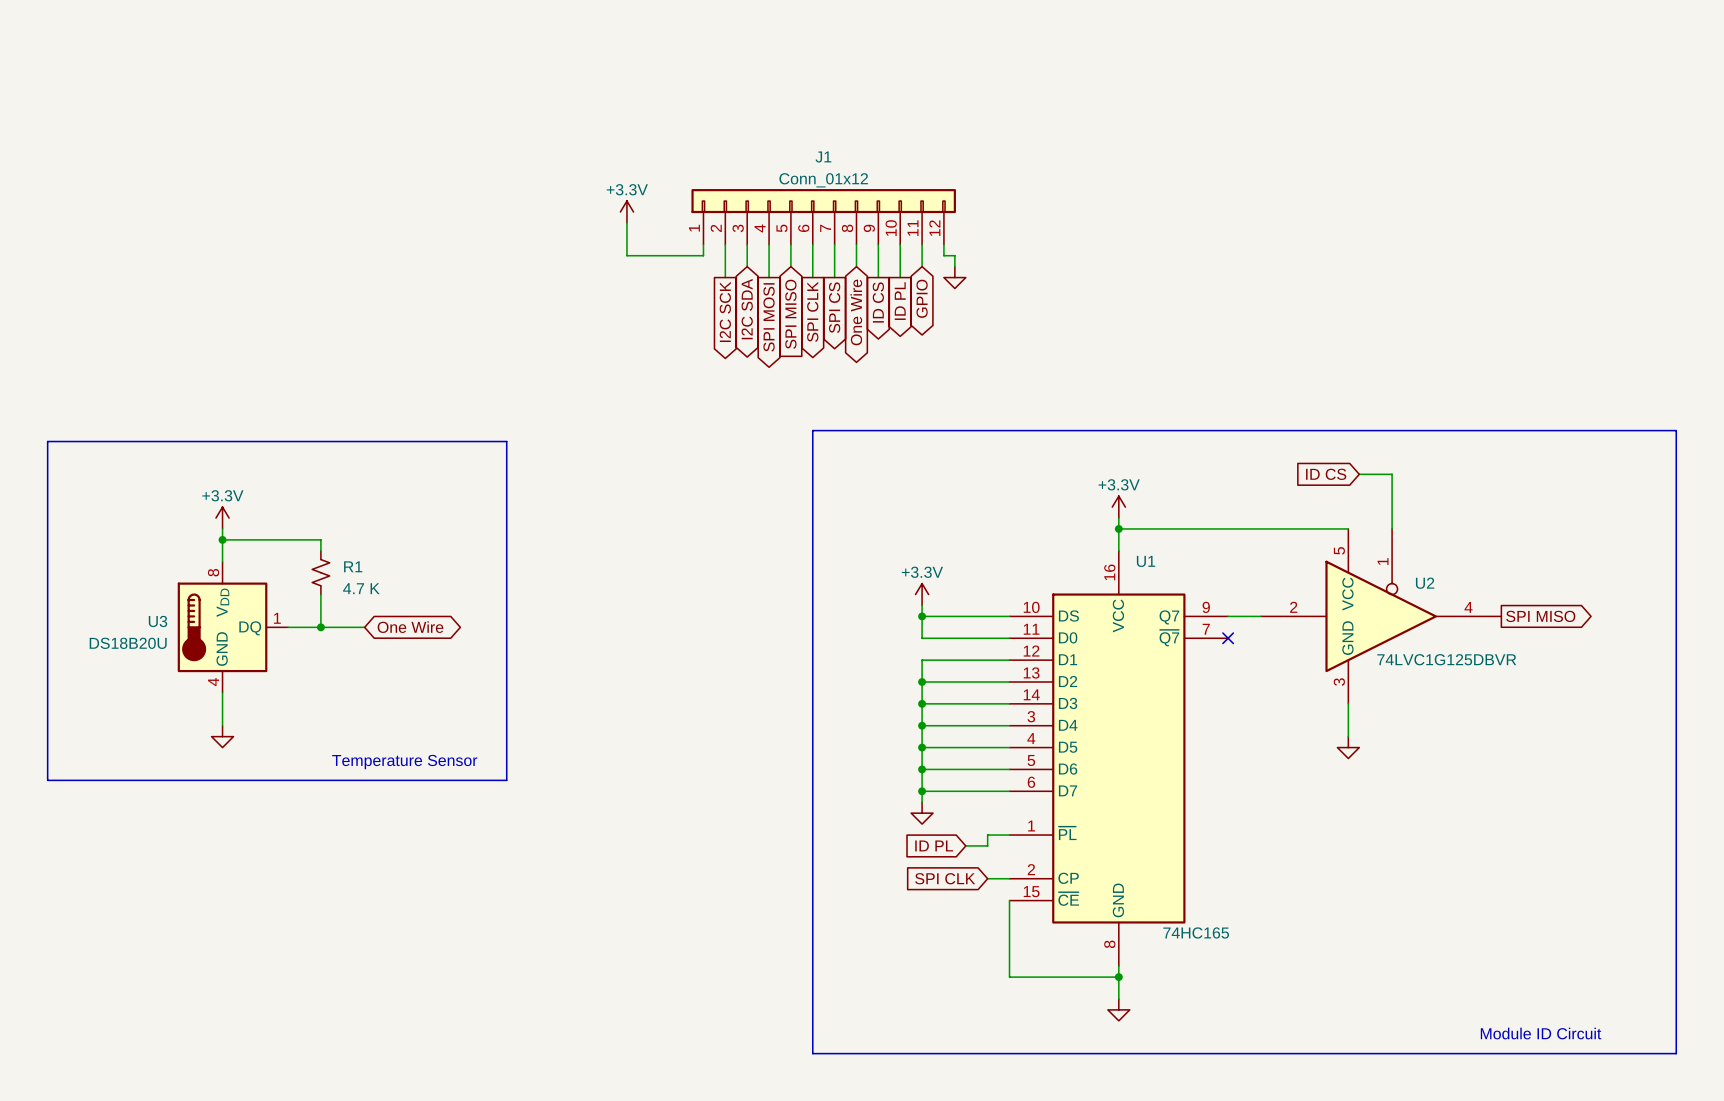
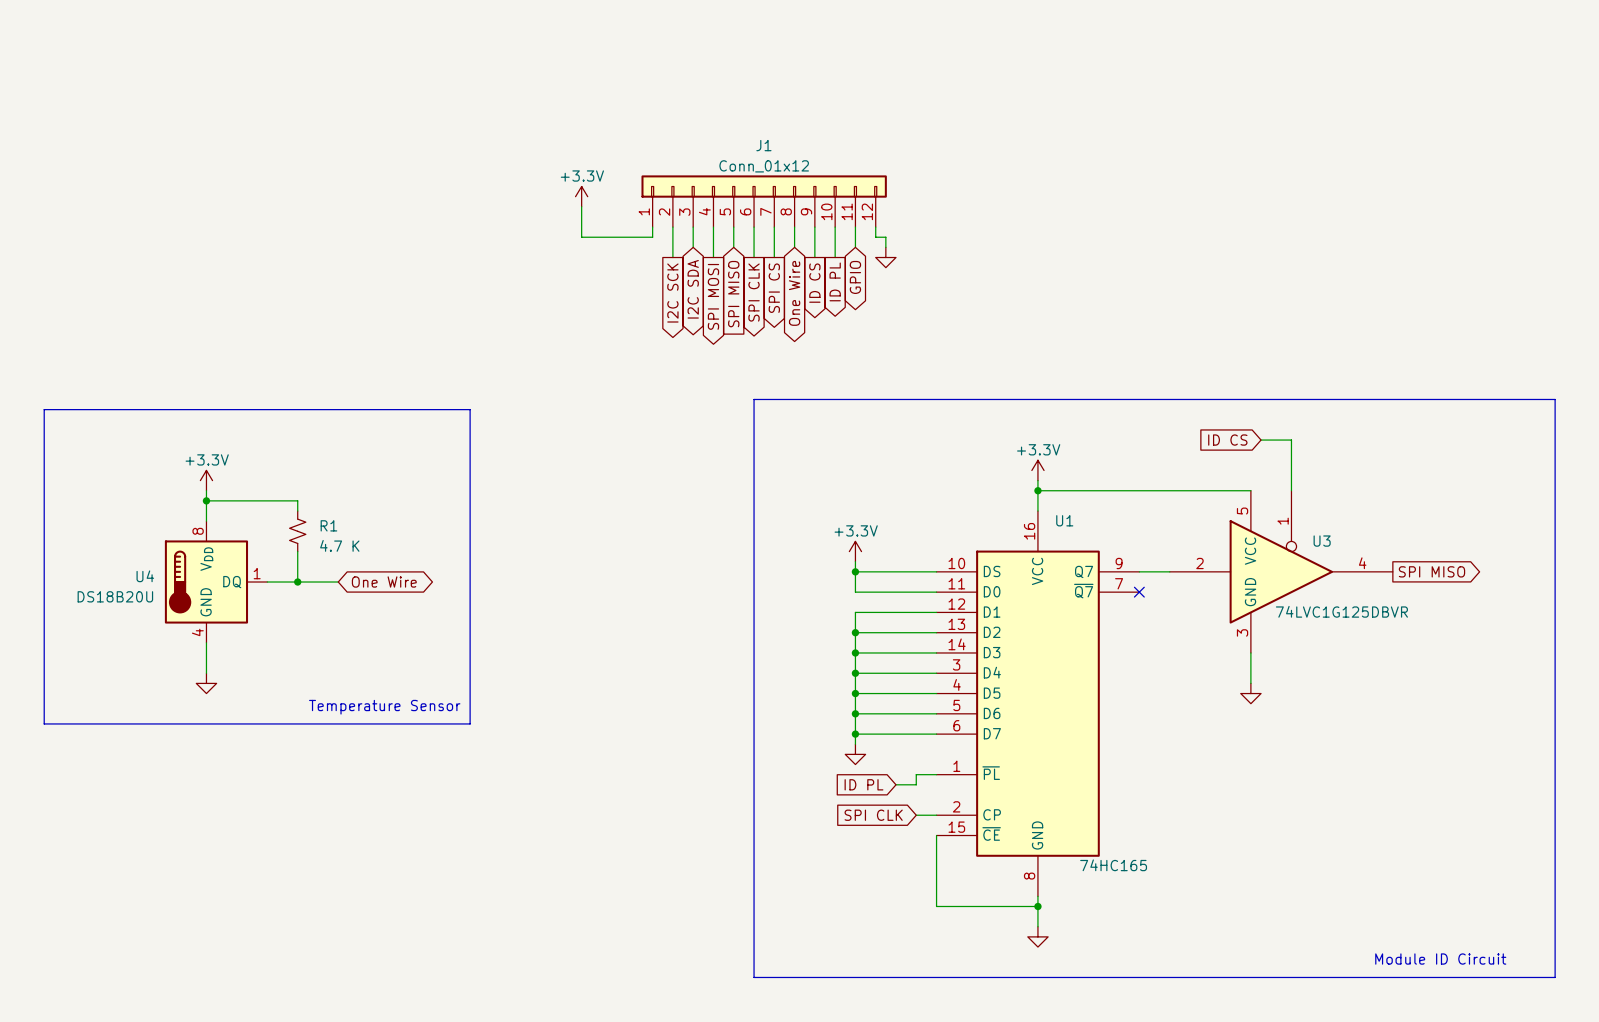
U2 name: U2 (1425, 583) -> U3 (1322, 541)
U3 name: U3 (158, 621) -> U4 (145, 576)

